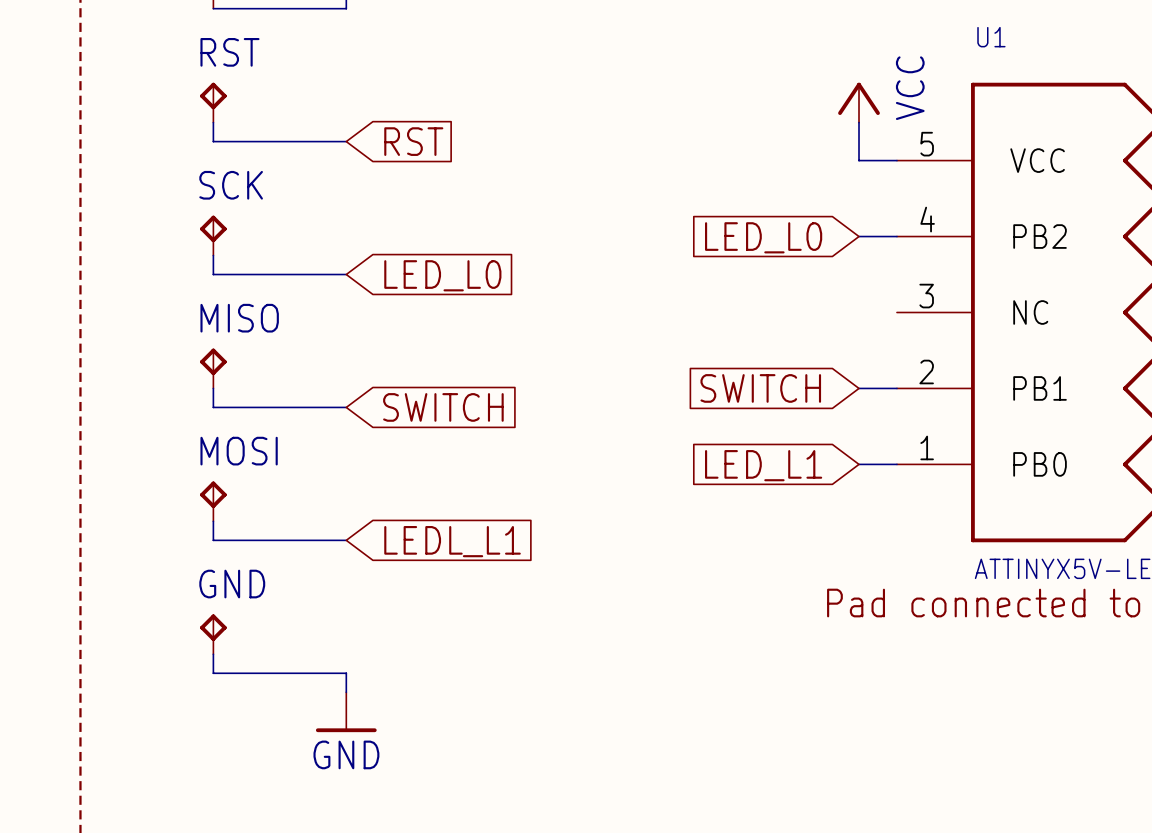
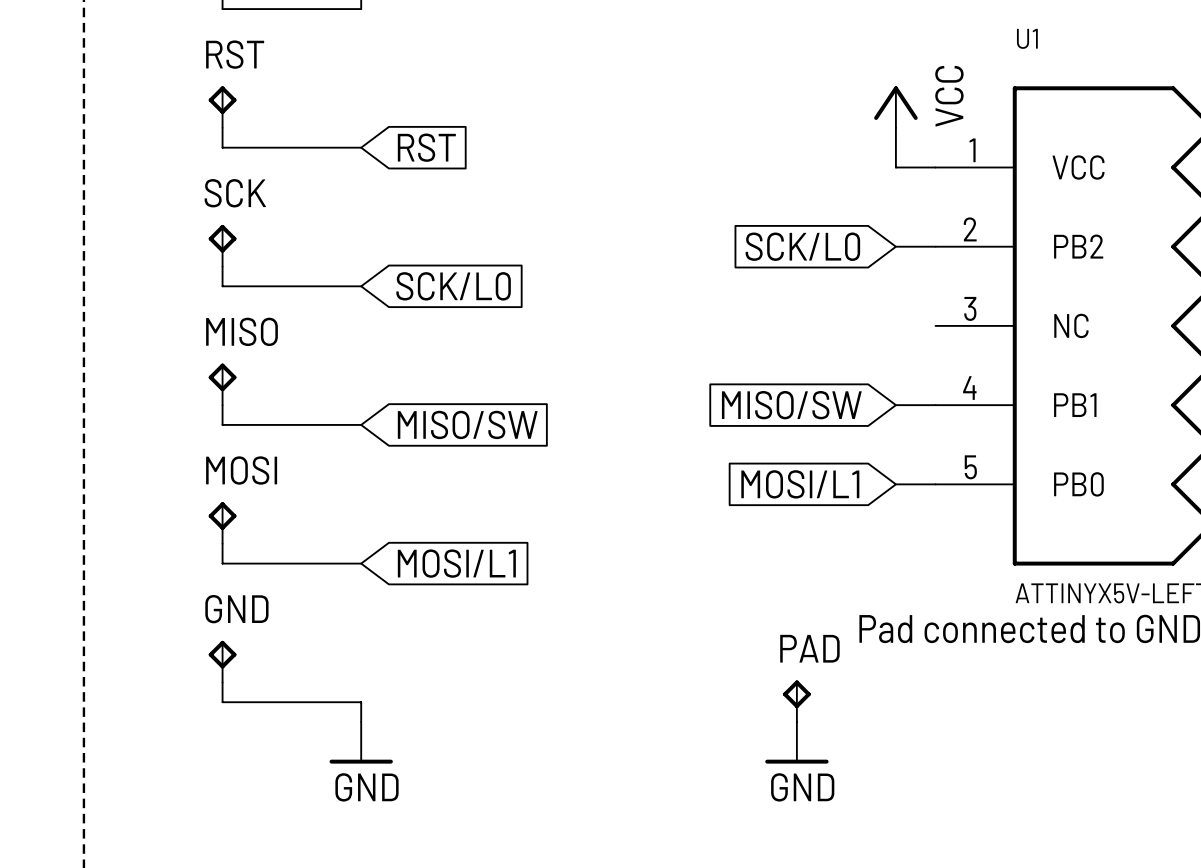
U1 pin number: 5 (927, 144) -> 1 (972, 150)
U1 pin number: 4 (927, 219) -> 2 (970, 229)
global label: LED_L0 (763, 237) -> SCK/L0 (802, 246)
global label: LED_L0 (442, 275) -> SCK/L0 (453, 286)
U1 pin number: 2 (926, 372) -> 4 (969, 387)
global label: SWITCH (760, 388) -> MISO/SW (791, 405)
global label: SWITCH (443, 407) -> MISO/SW (467, 424)
U1 pin number: 1 (927, 447) -> 5 (970, 467)
global label: LED_L1 (763, 465) -> MOSI/L1 (800, 484)
global label: LEDL_L1 (452, 541) -> MOSI/L1 (456, 563)
PAD: none -> (796, 701)
power symbol: none -> GND (796, 742)

